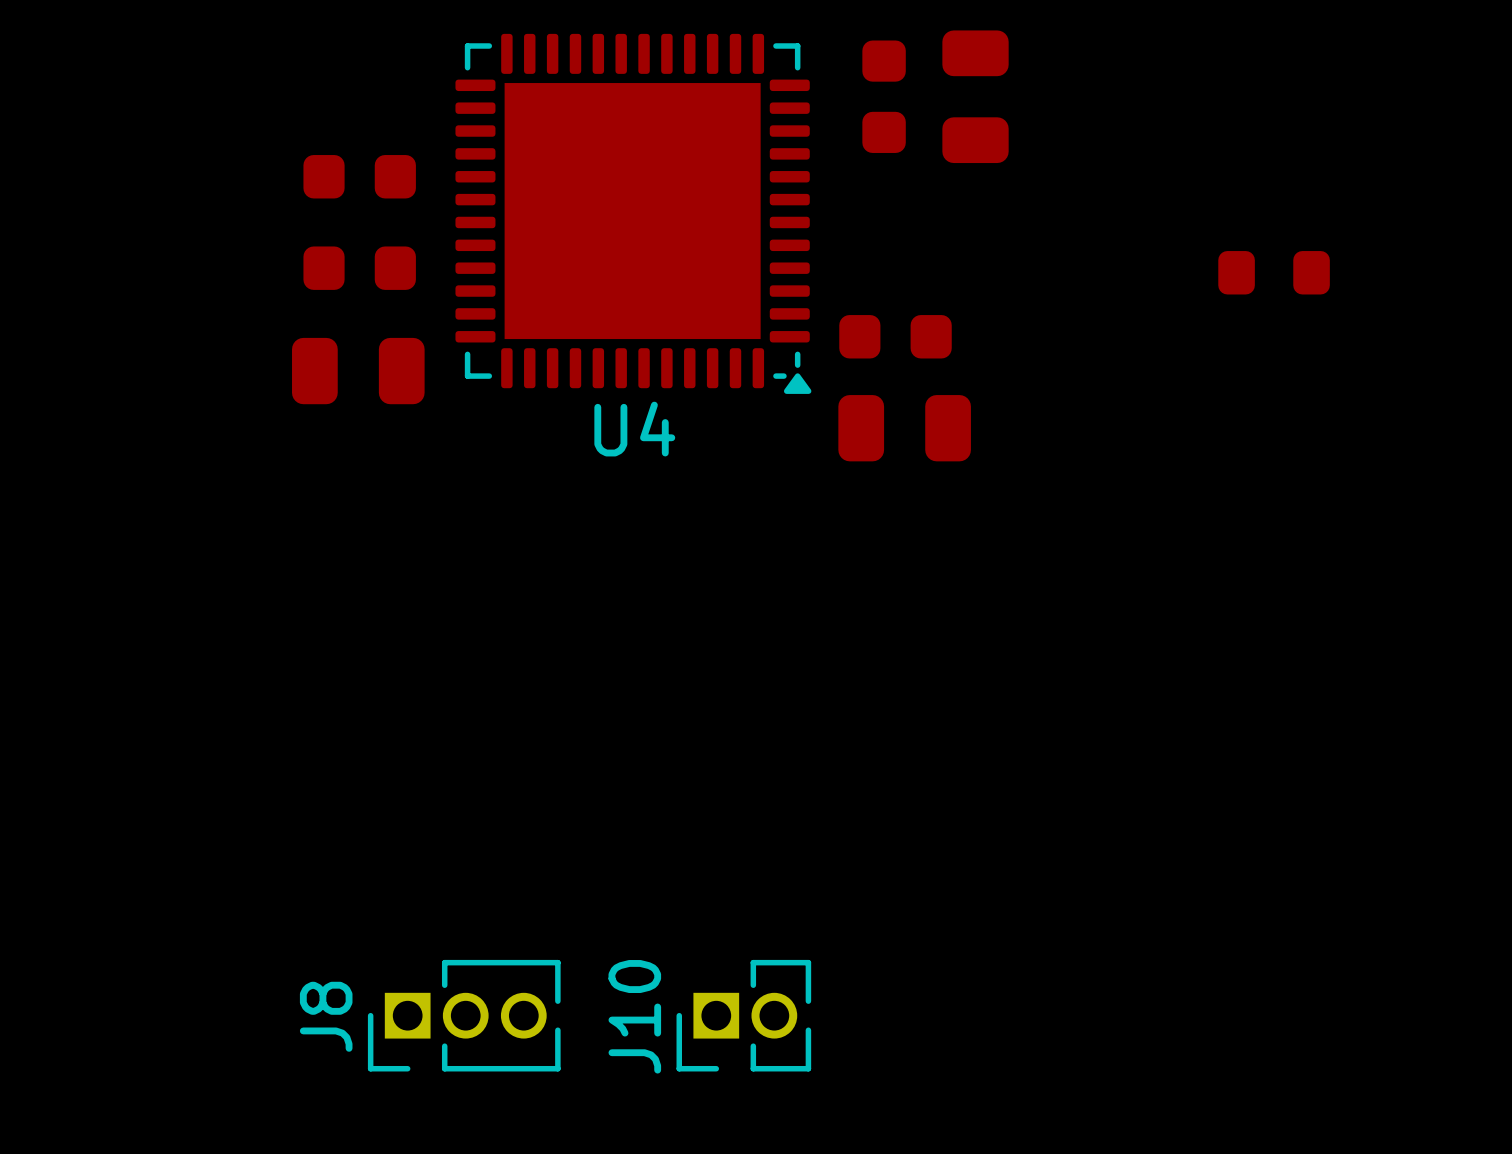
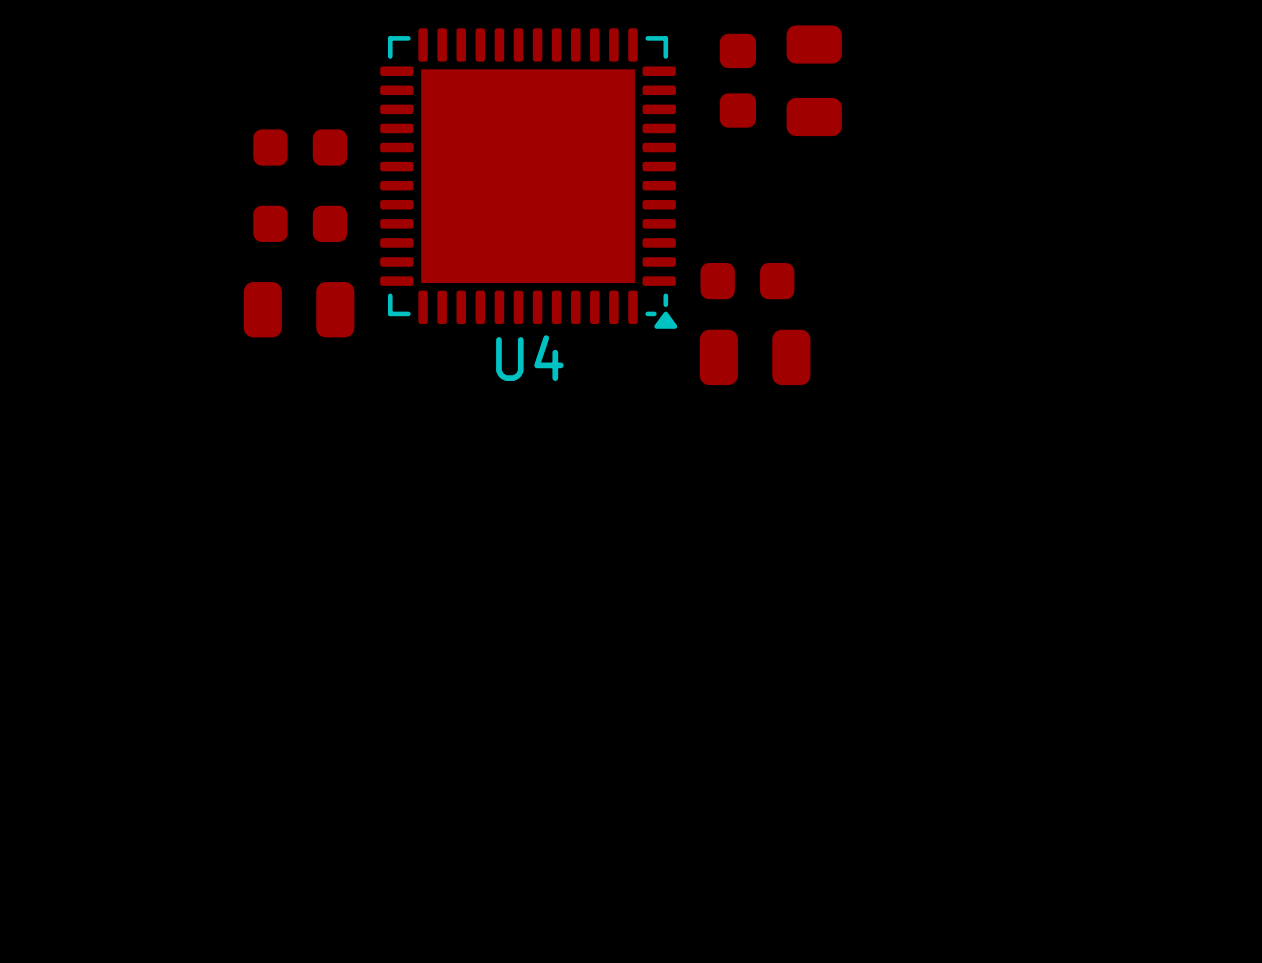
part: (1274, 272) -> none
J8: (464, 1015) -> none
J10: (743, 1015) -> none

